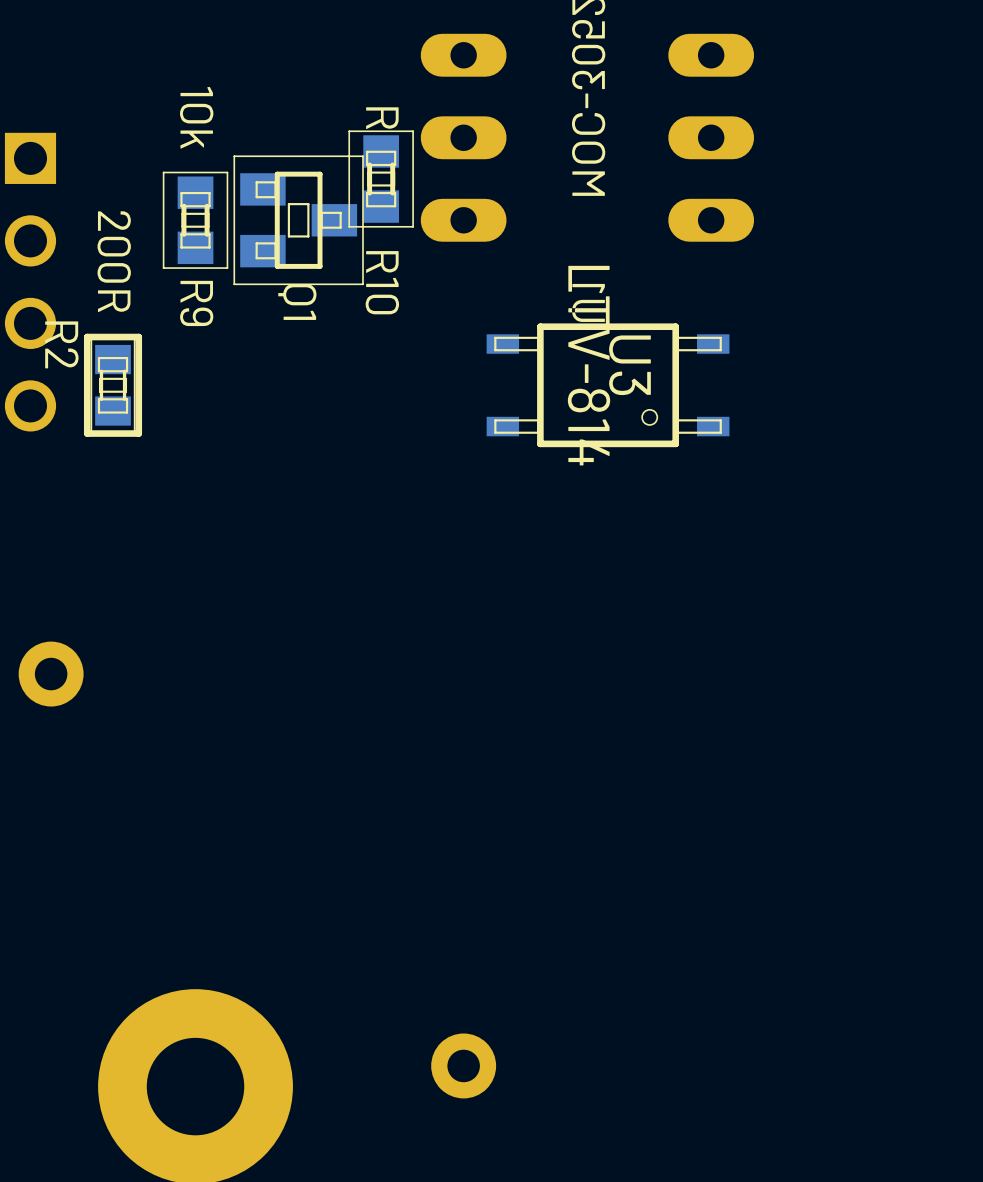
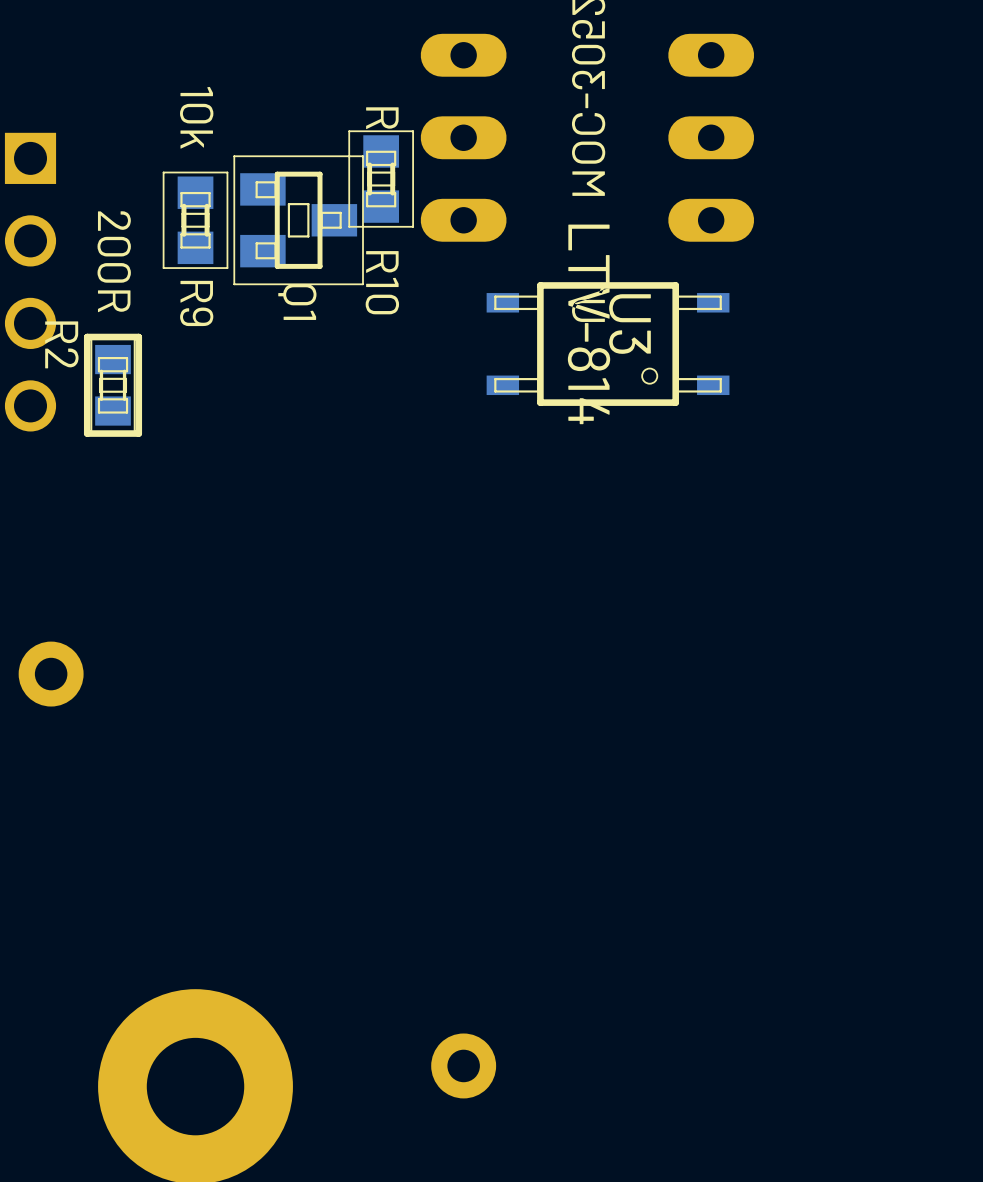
U3 position: (608, 385) -> (608, 344)

